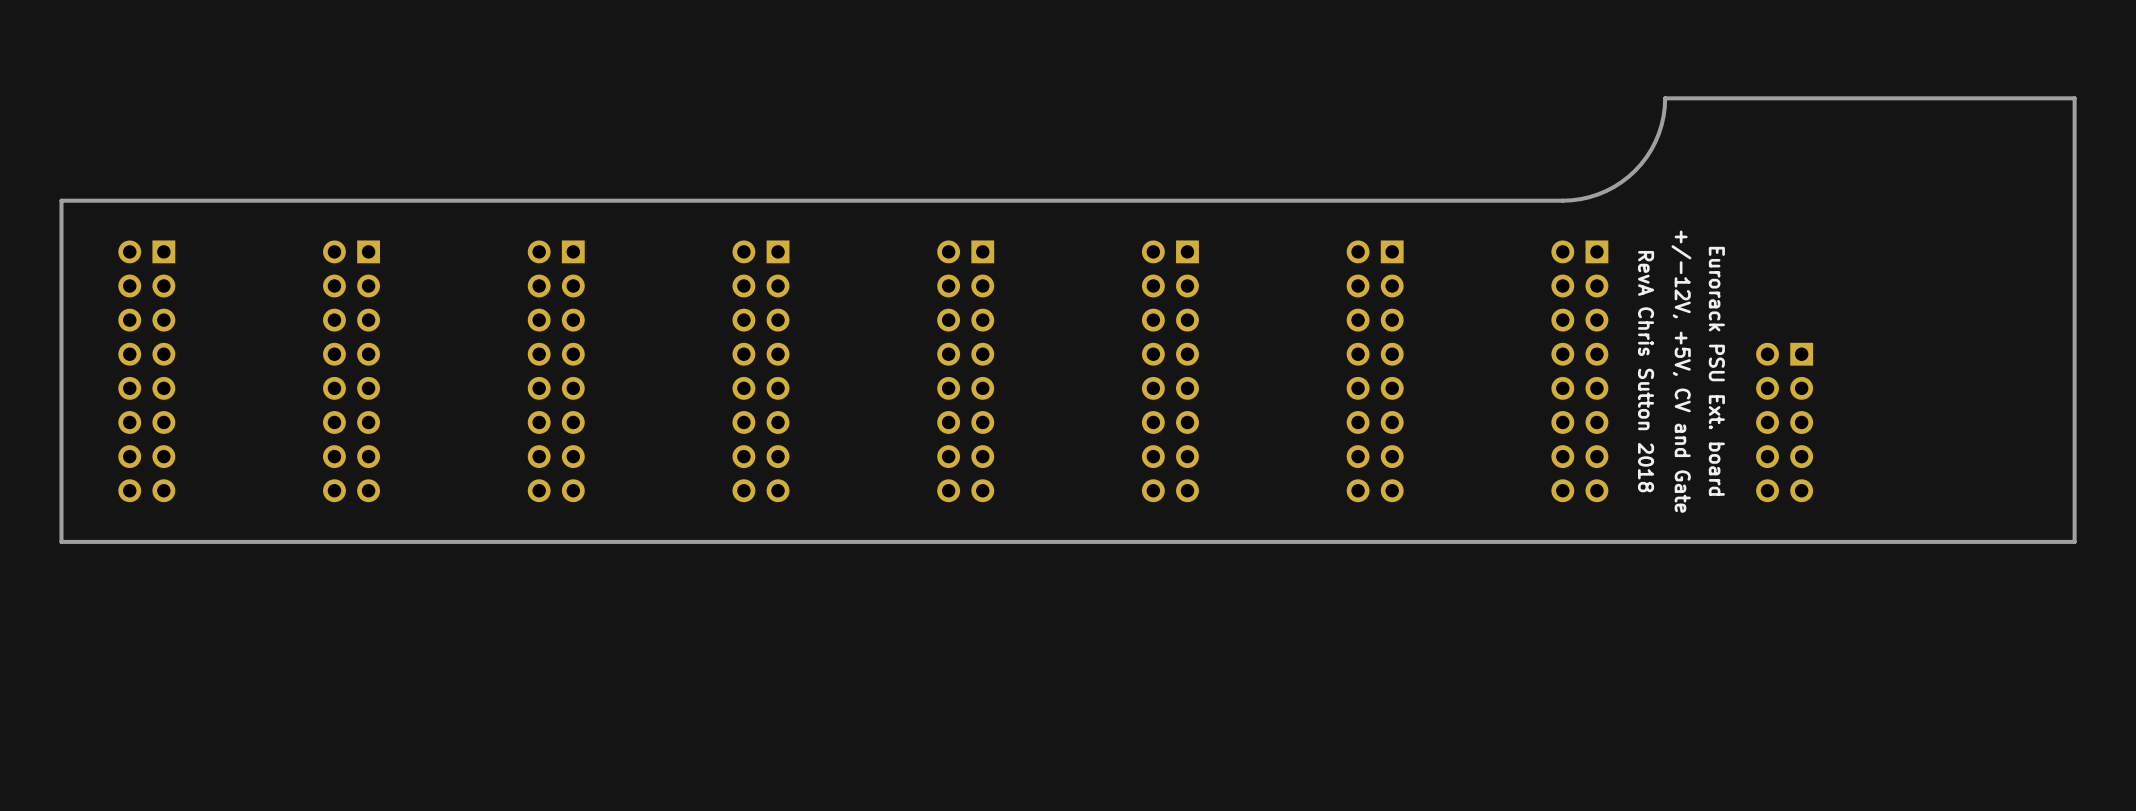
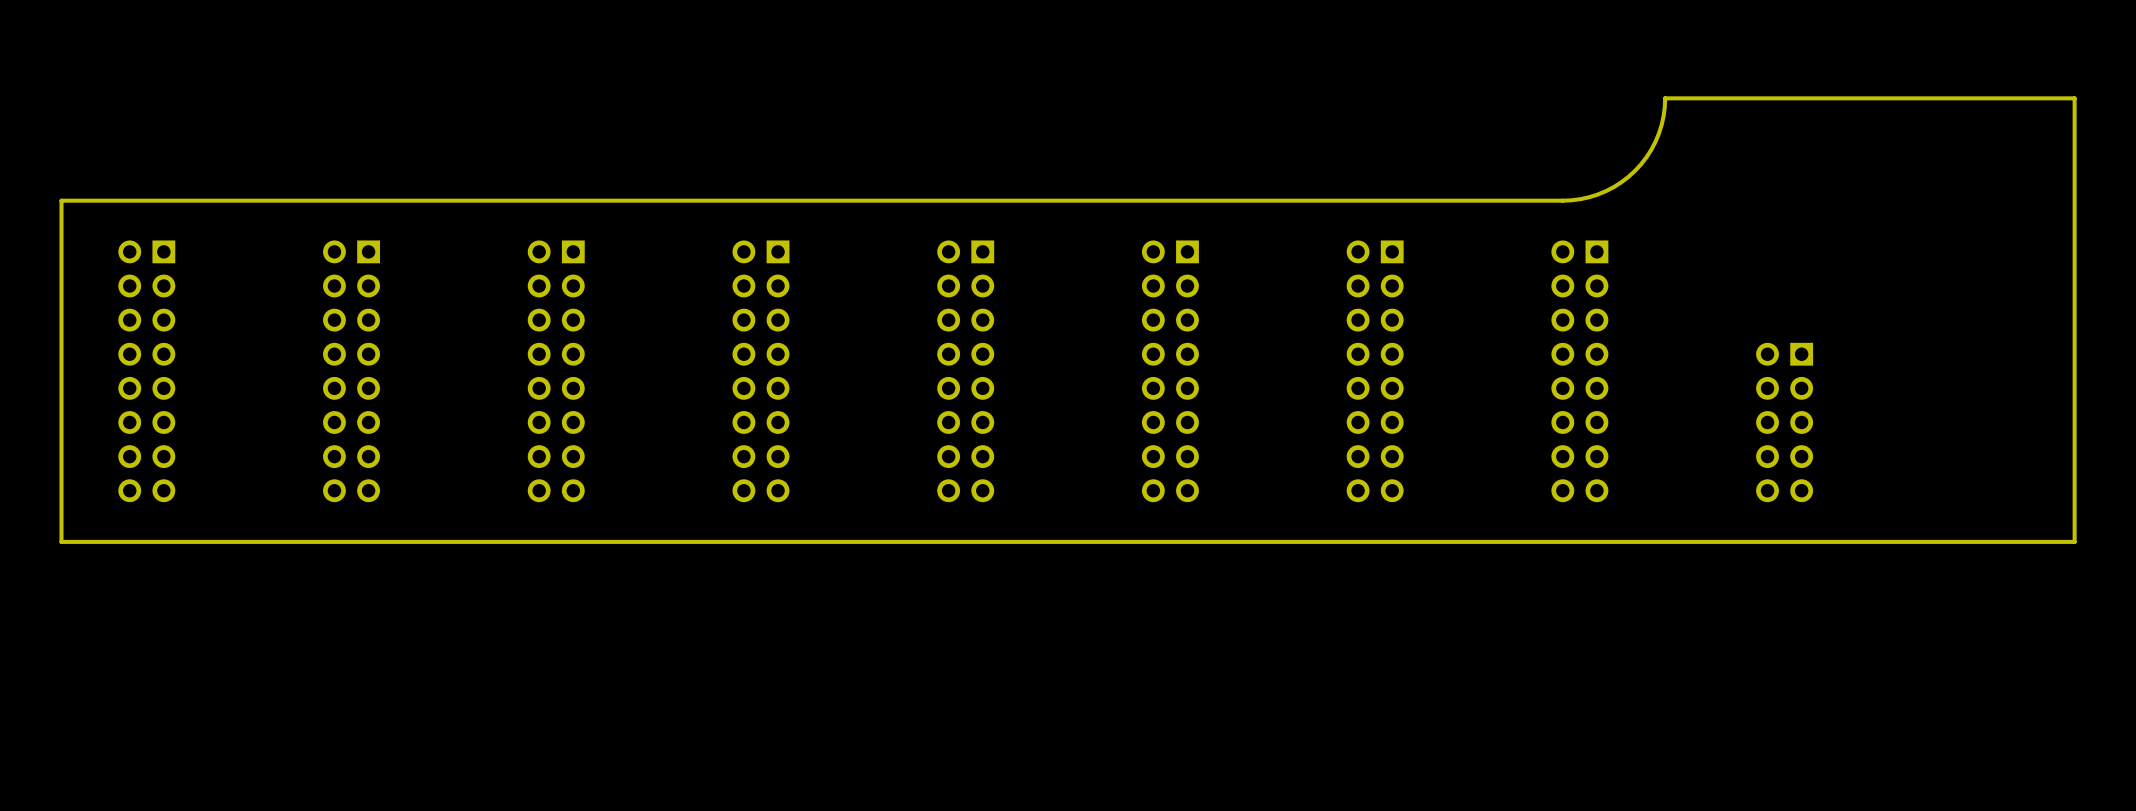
text: RevA Chris Sutton 2018 (1646, 371) -> none
text: +/-12V, +5V, CV and Gate (1681, 371) -> none
text: Eurorack PSU Ext. board (1716, 371) -> none

